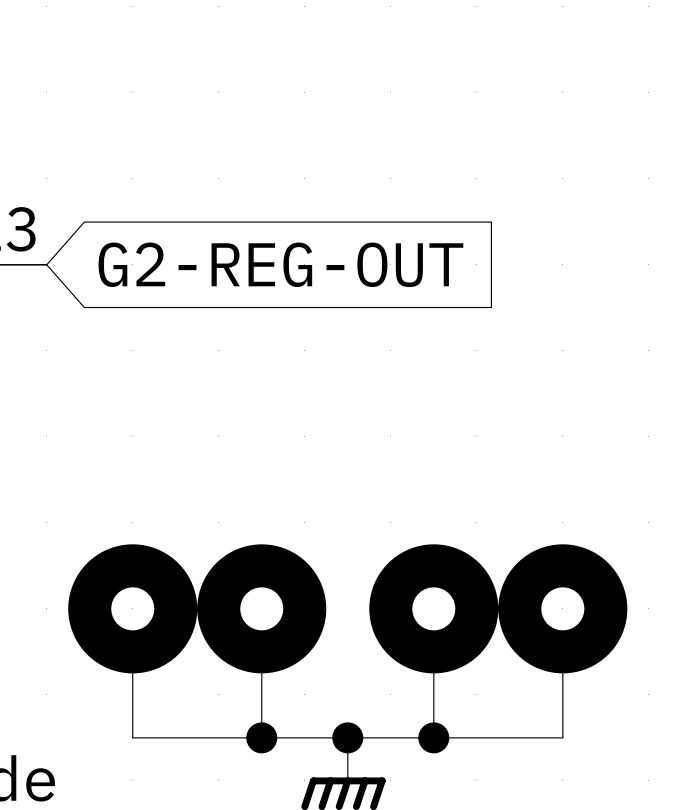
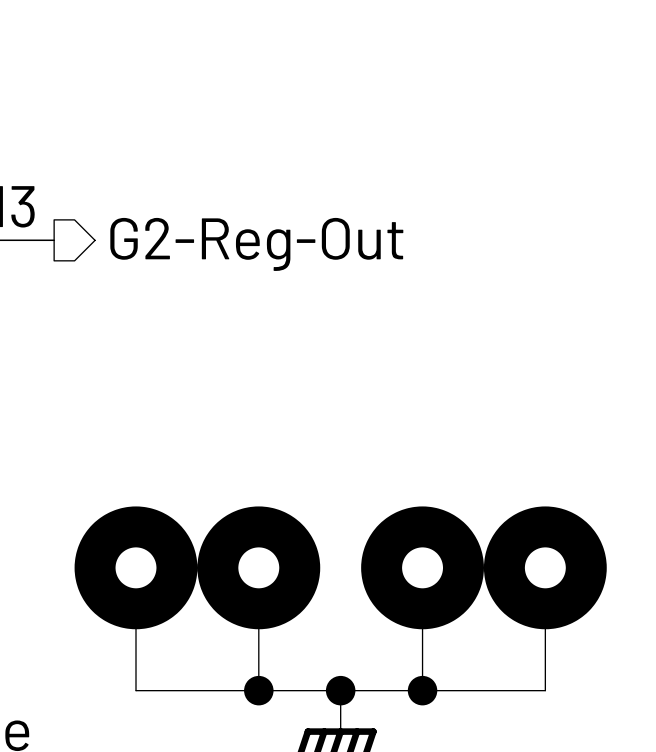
global label: G2-REG-OUT (280, 264) -> none
hierarchical label: none -> G2-Reg-Out (256, 244)

